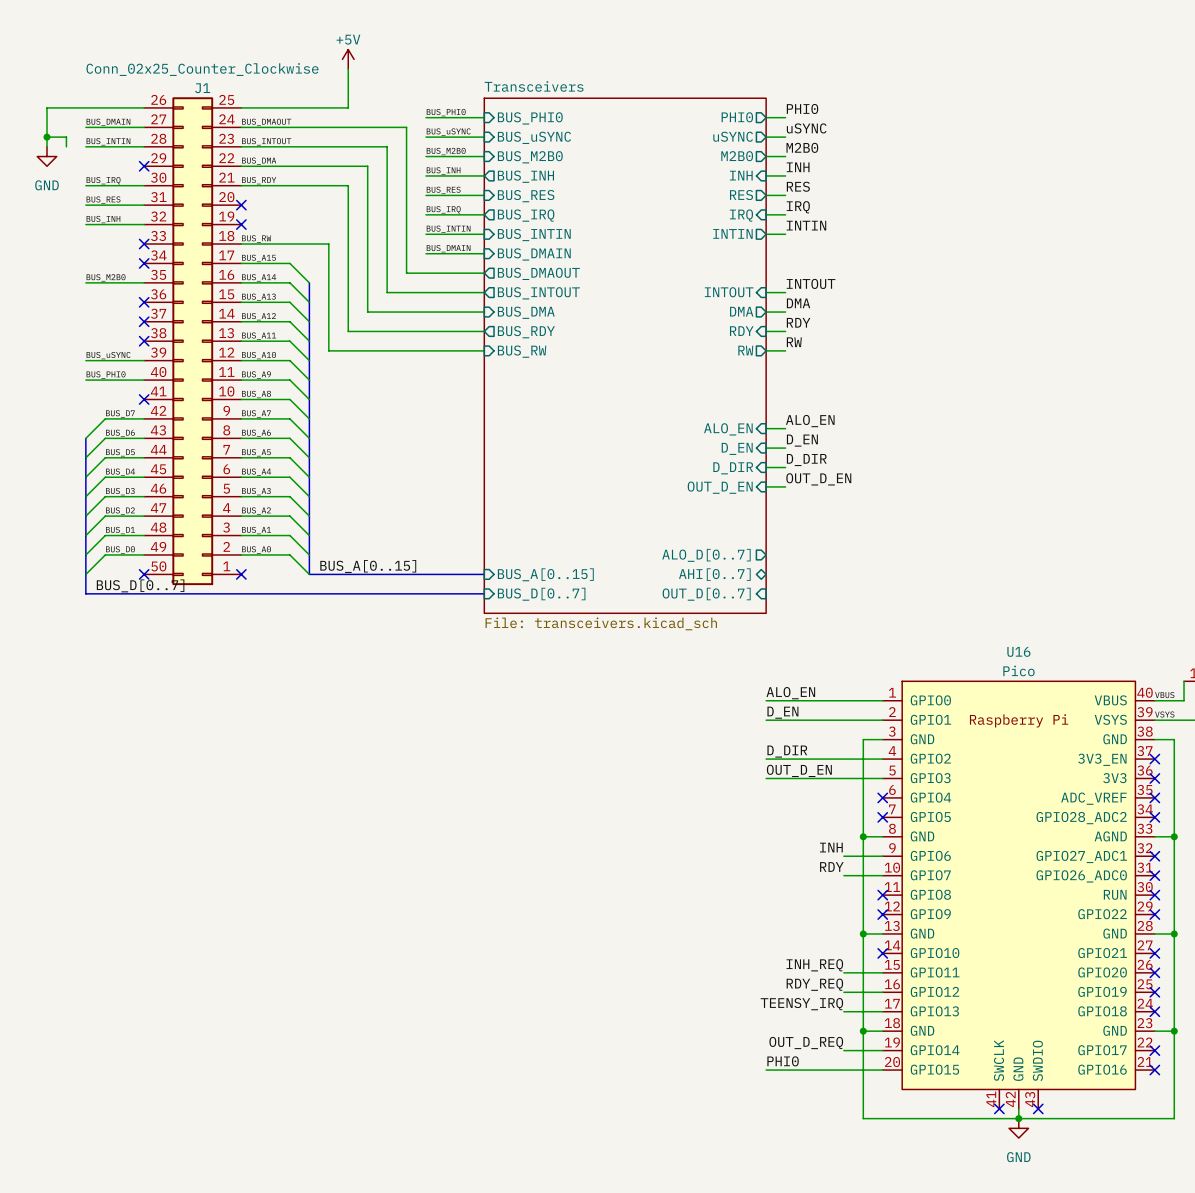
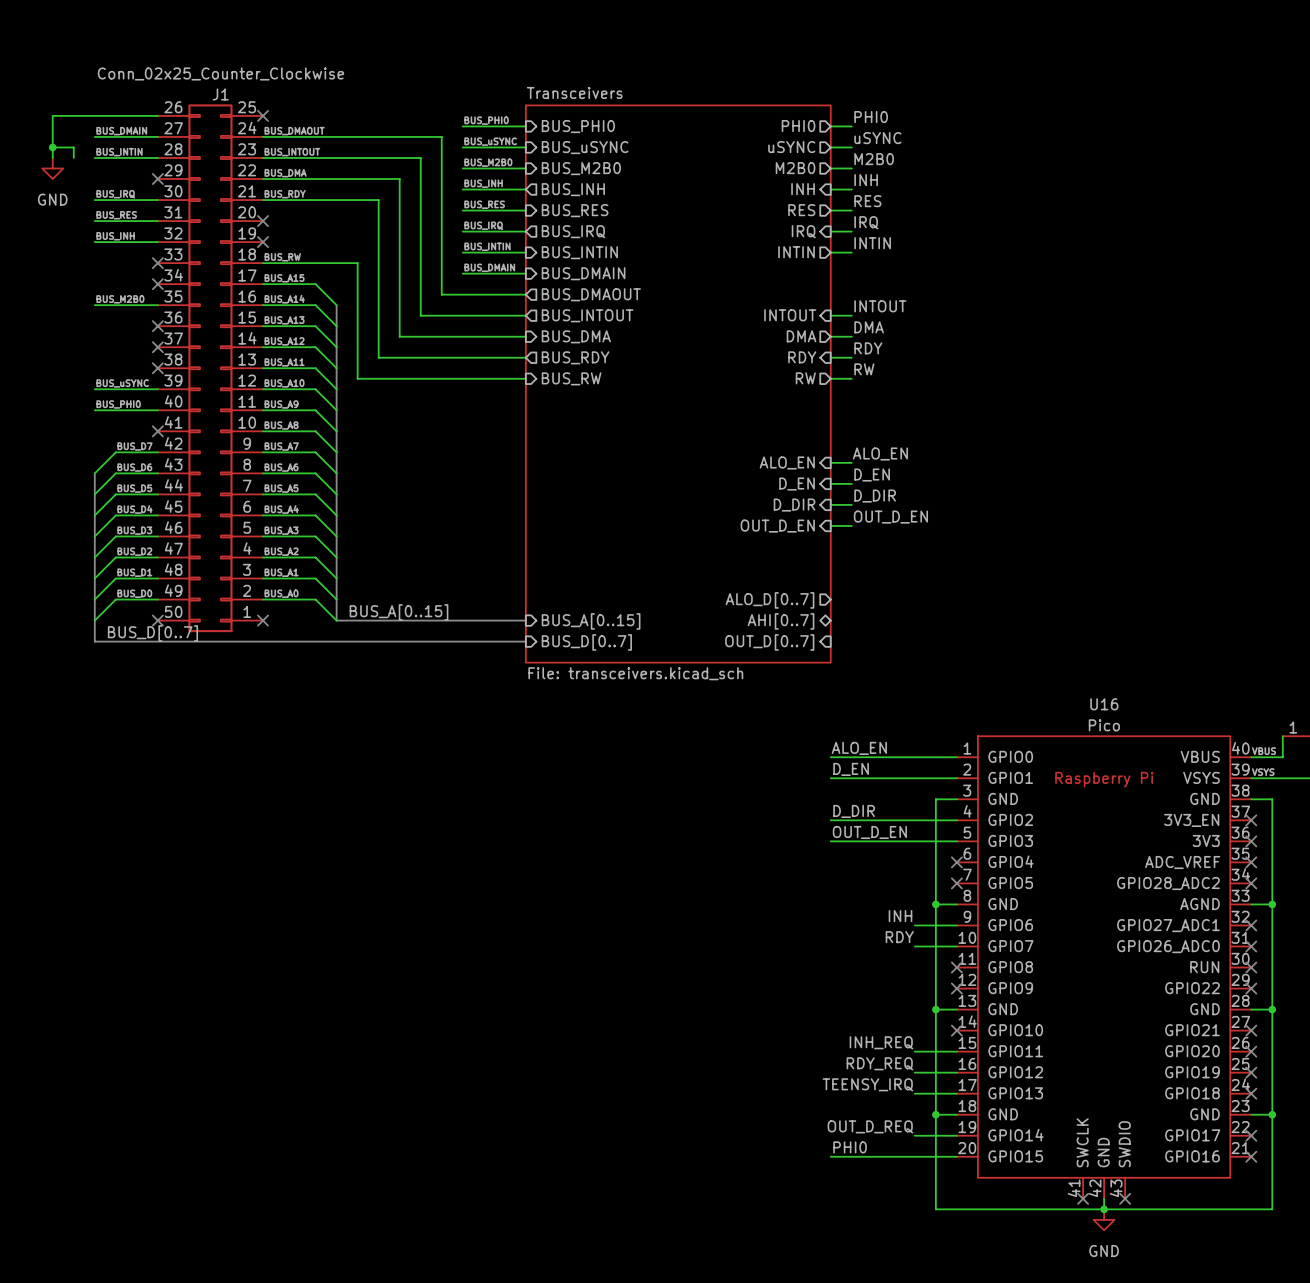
power symbol: +5V (348, 59) -> none
wire: (348, 69) (348, 107) (241, 107) -> none
no-connect mark: none -> (263, 115)

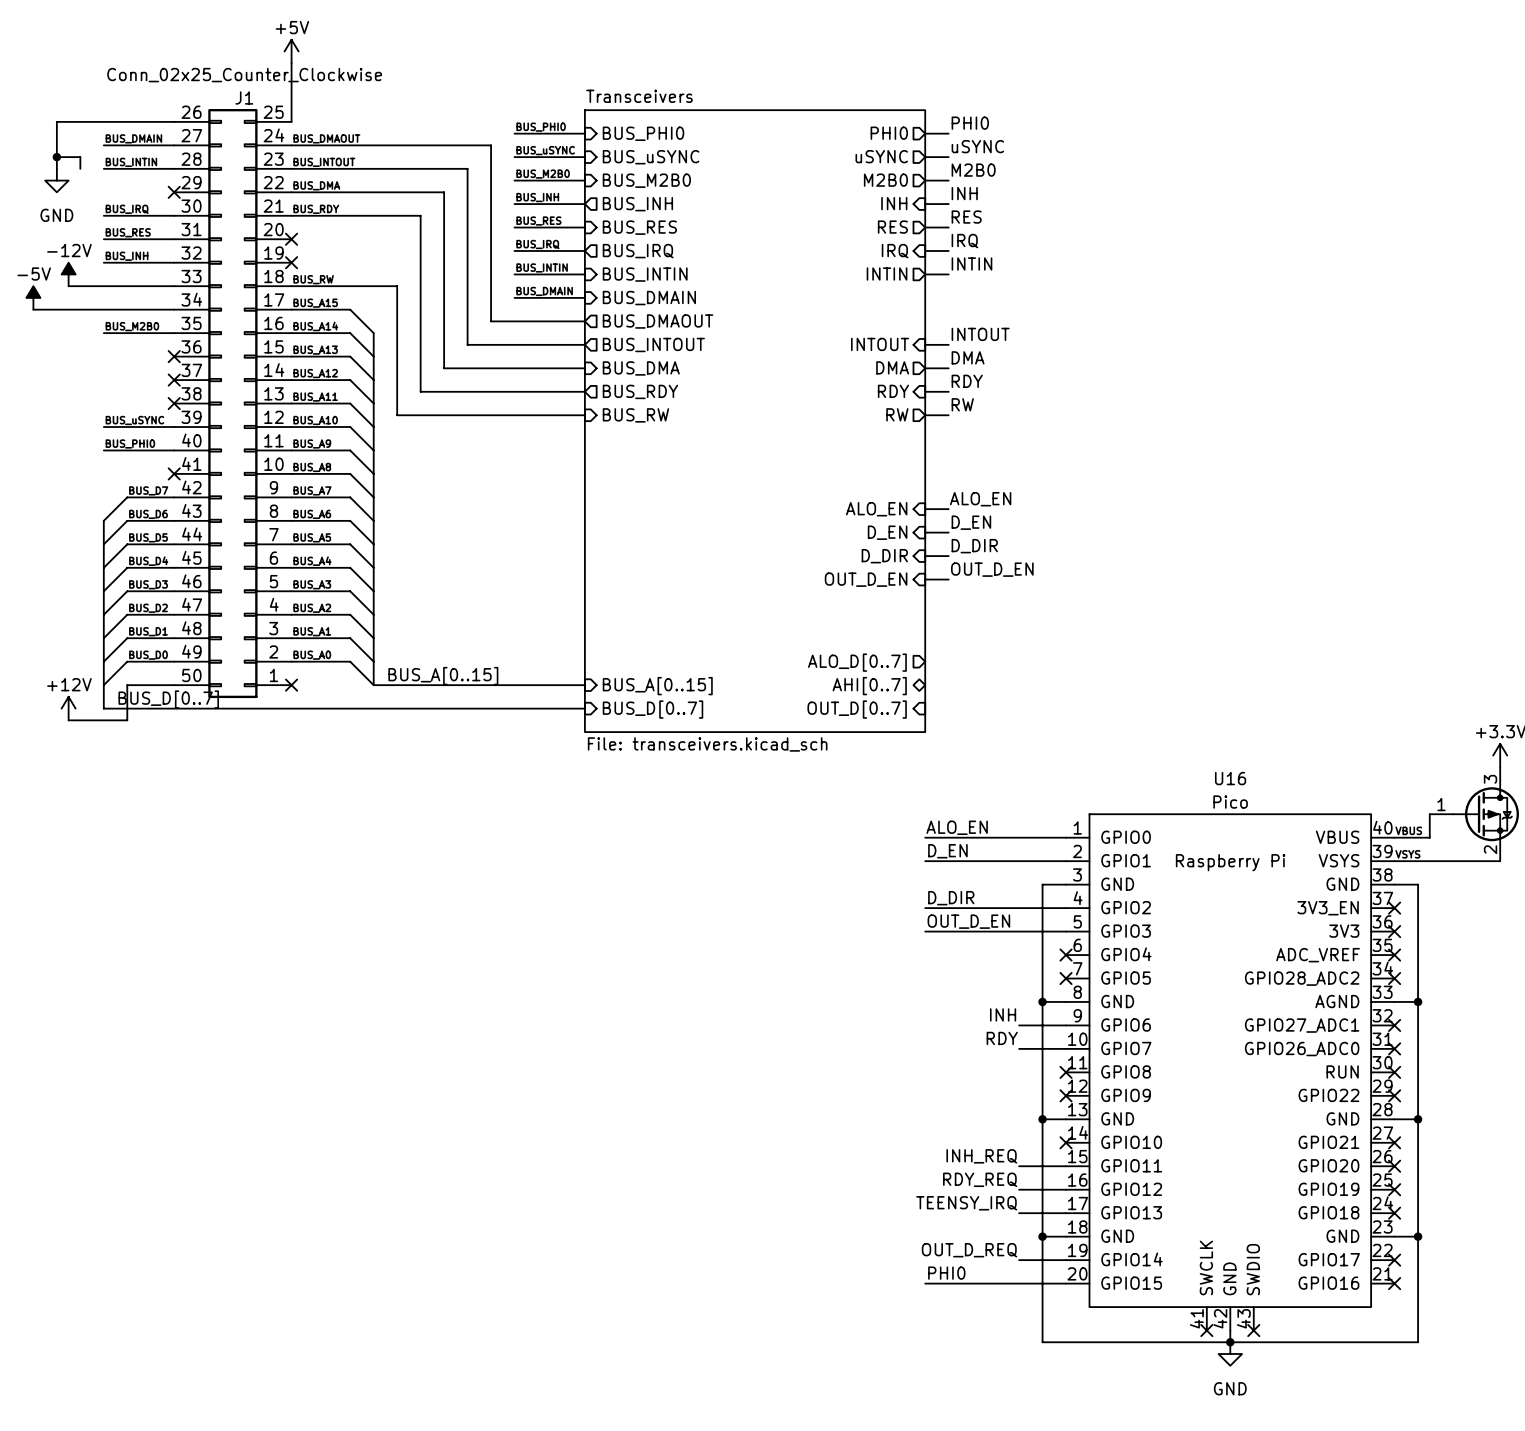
power symbol: none -> +5V (291, 51)
wire: none -> (291, 63) (291, 121)
no-connect mark: (263, 115) -> none
power symbol: none -> -12V (68, 274)
wire: none -> (68, 286) (174, 286)
no-connect mark: (157, 263) -> none
power symbol: none -> -5V (33, 297)
wire: none -> (33, 309) (174, 309)
no-connect mark: (157, 284) -> none
wire: none -> (174, 685) (127, 685) (127, 720) (68, 720)
no-connect mark: (157, 620) -> none
power symbol: none -> +12V (68, 708)

